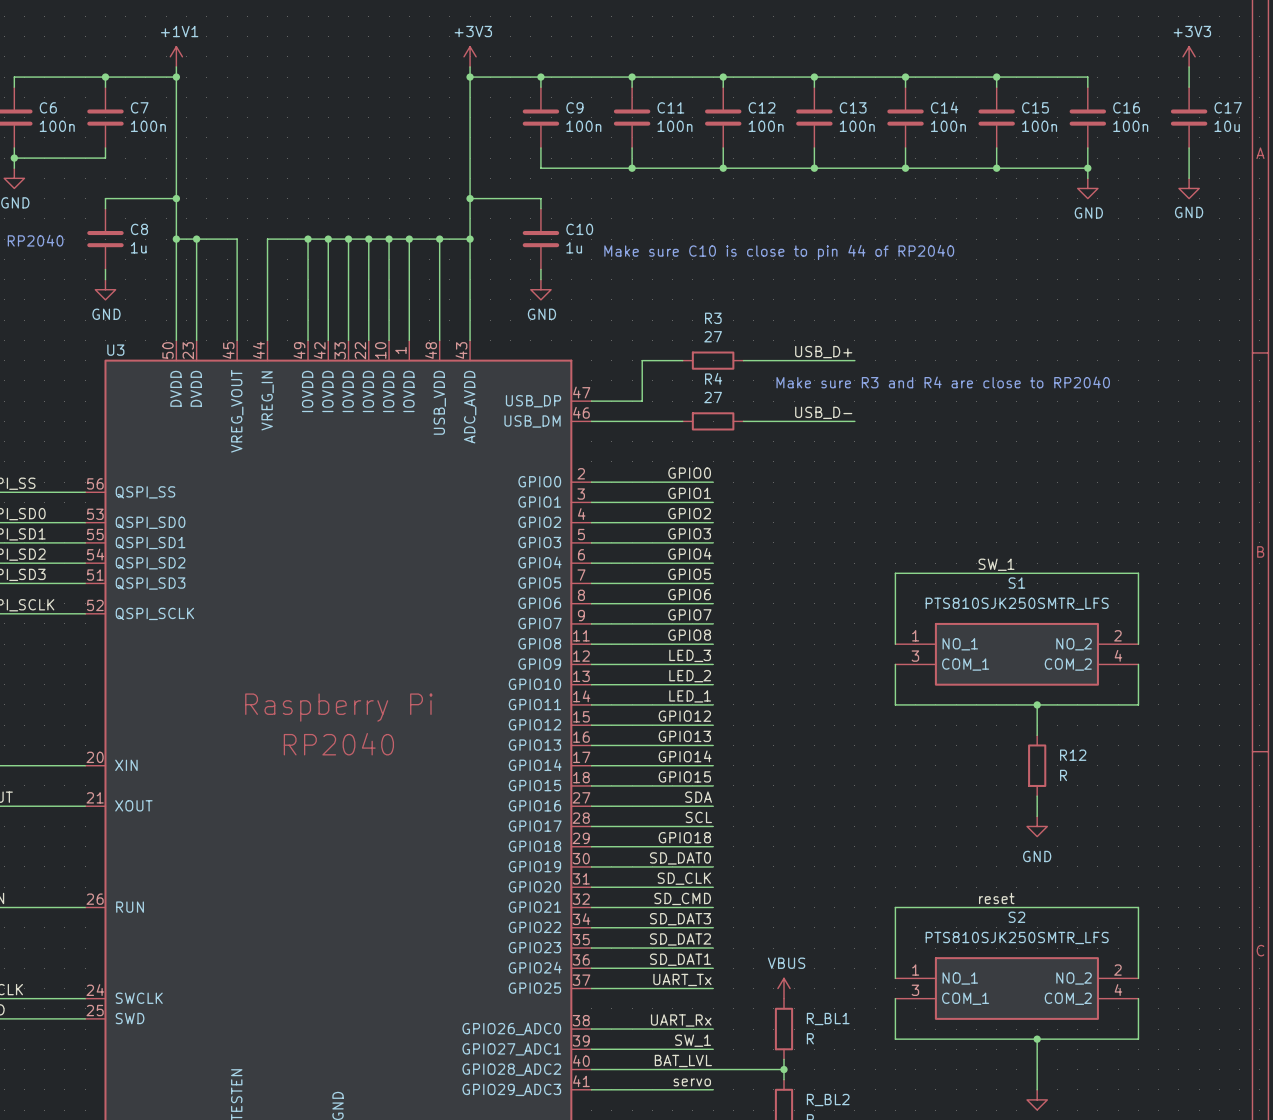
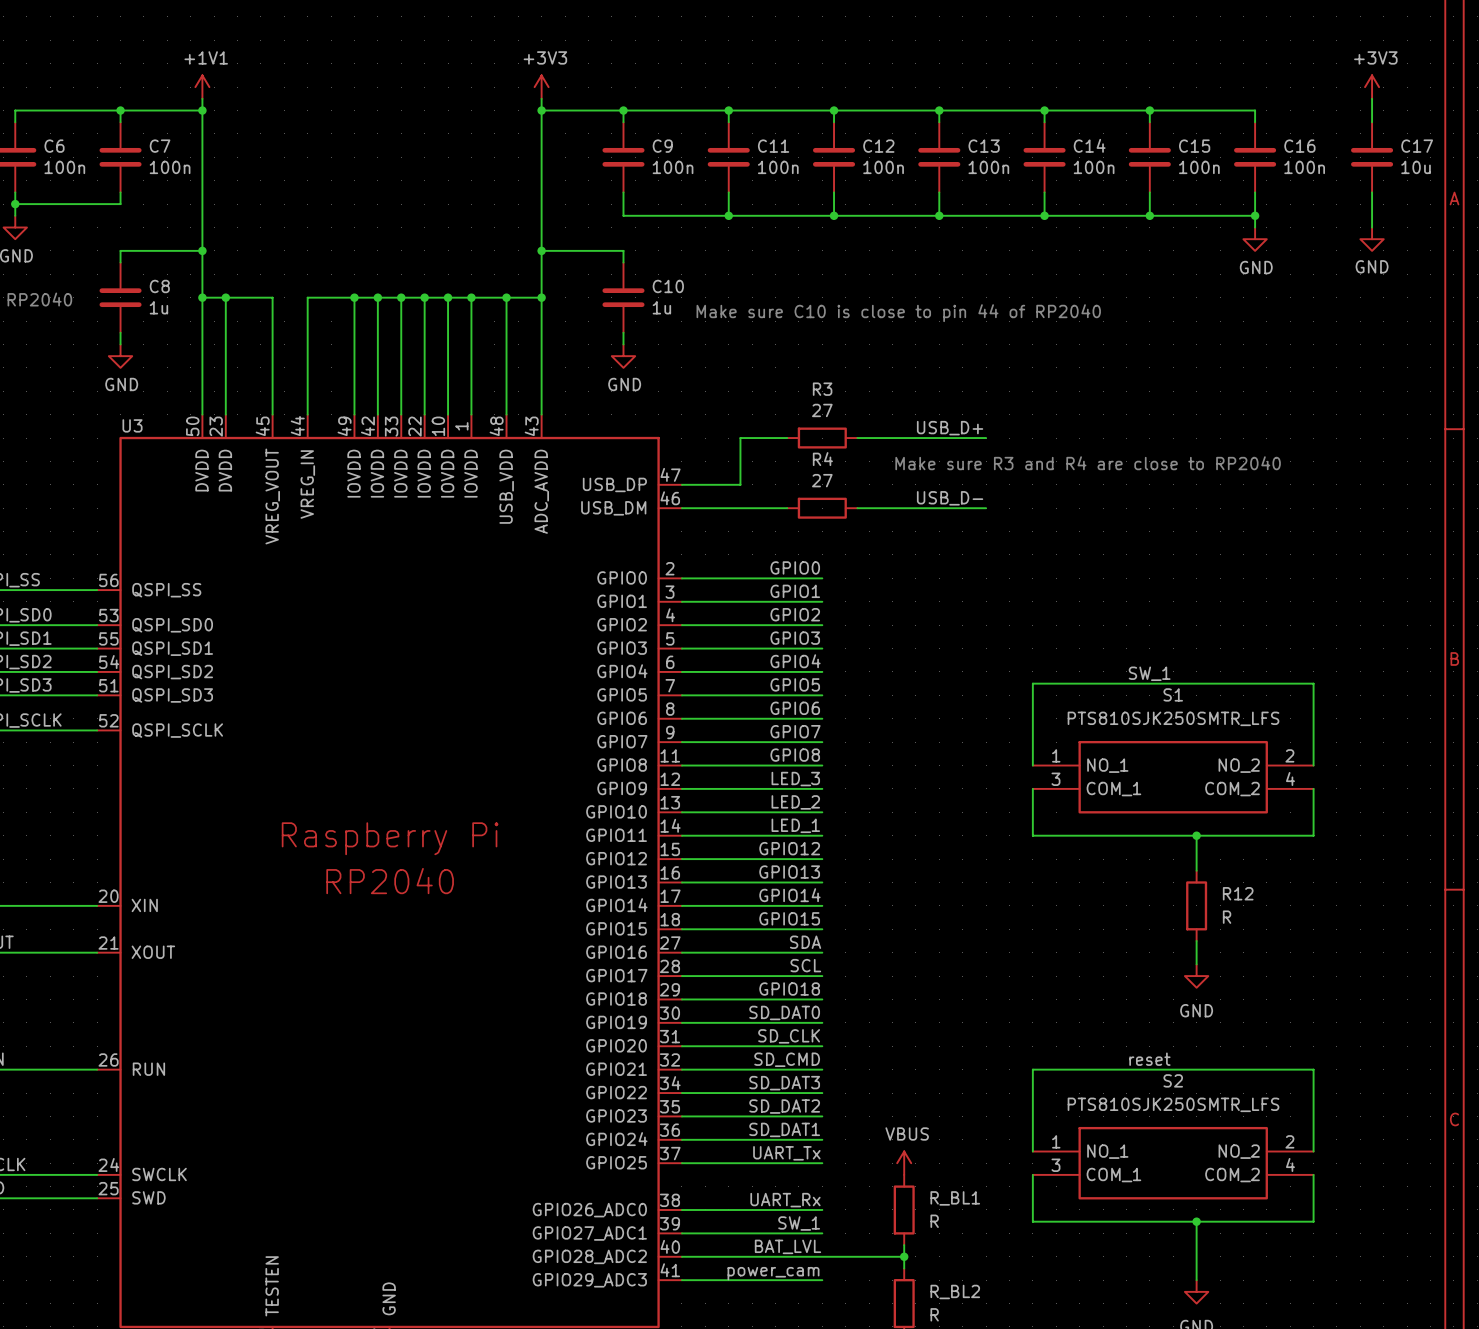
label: servo (692, 1082) -> power_cam (773, 1273)

